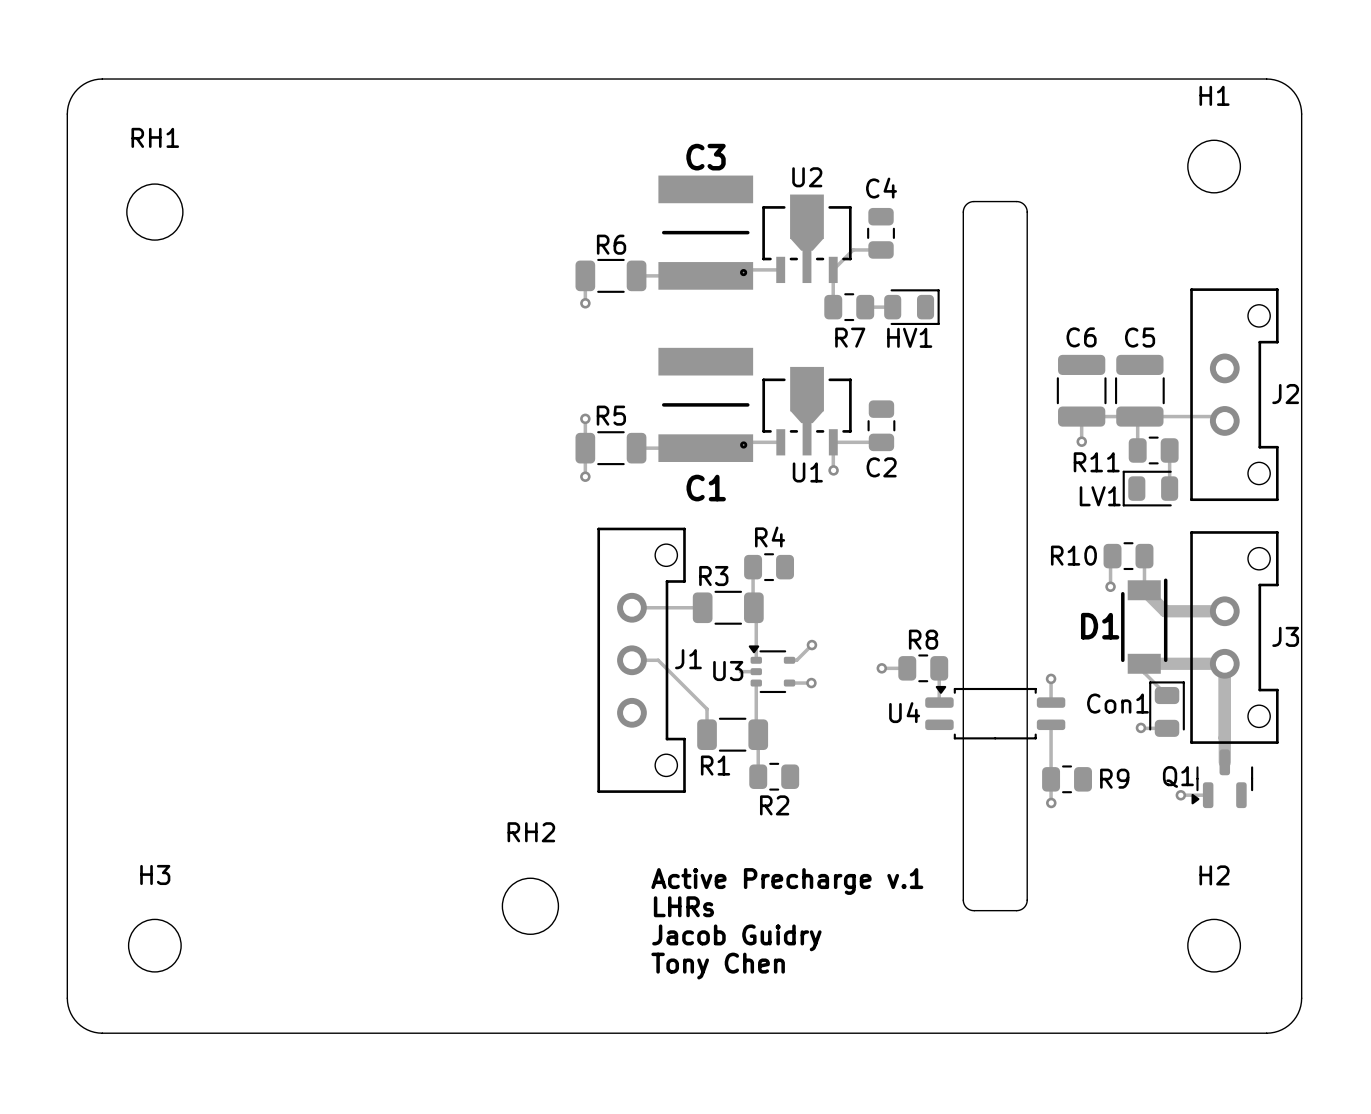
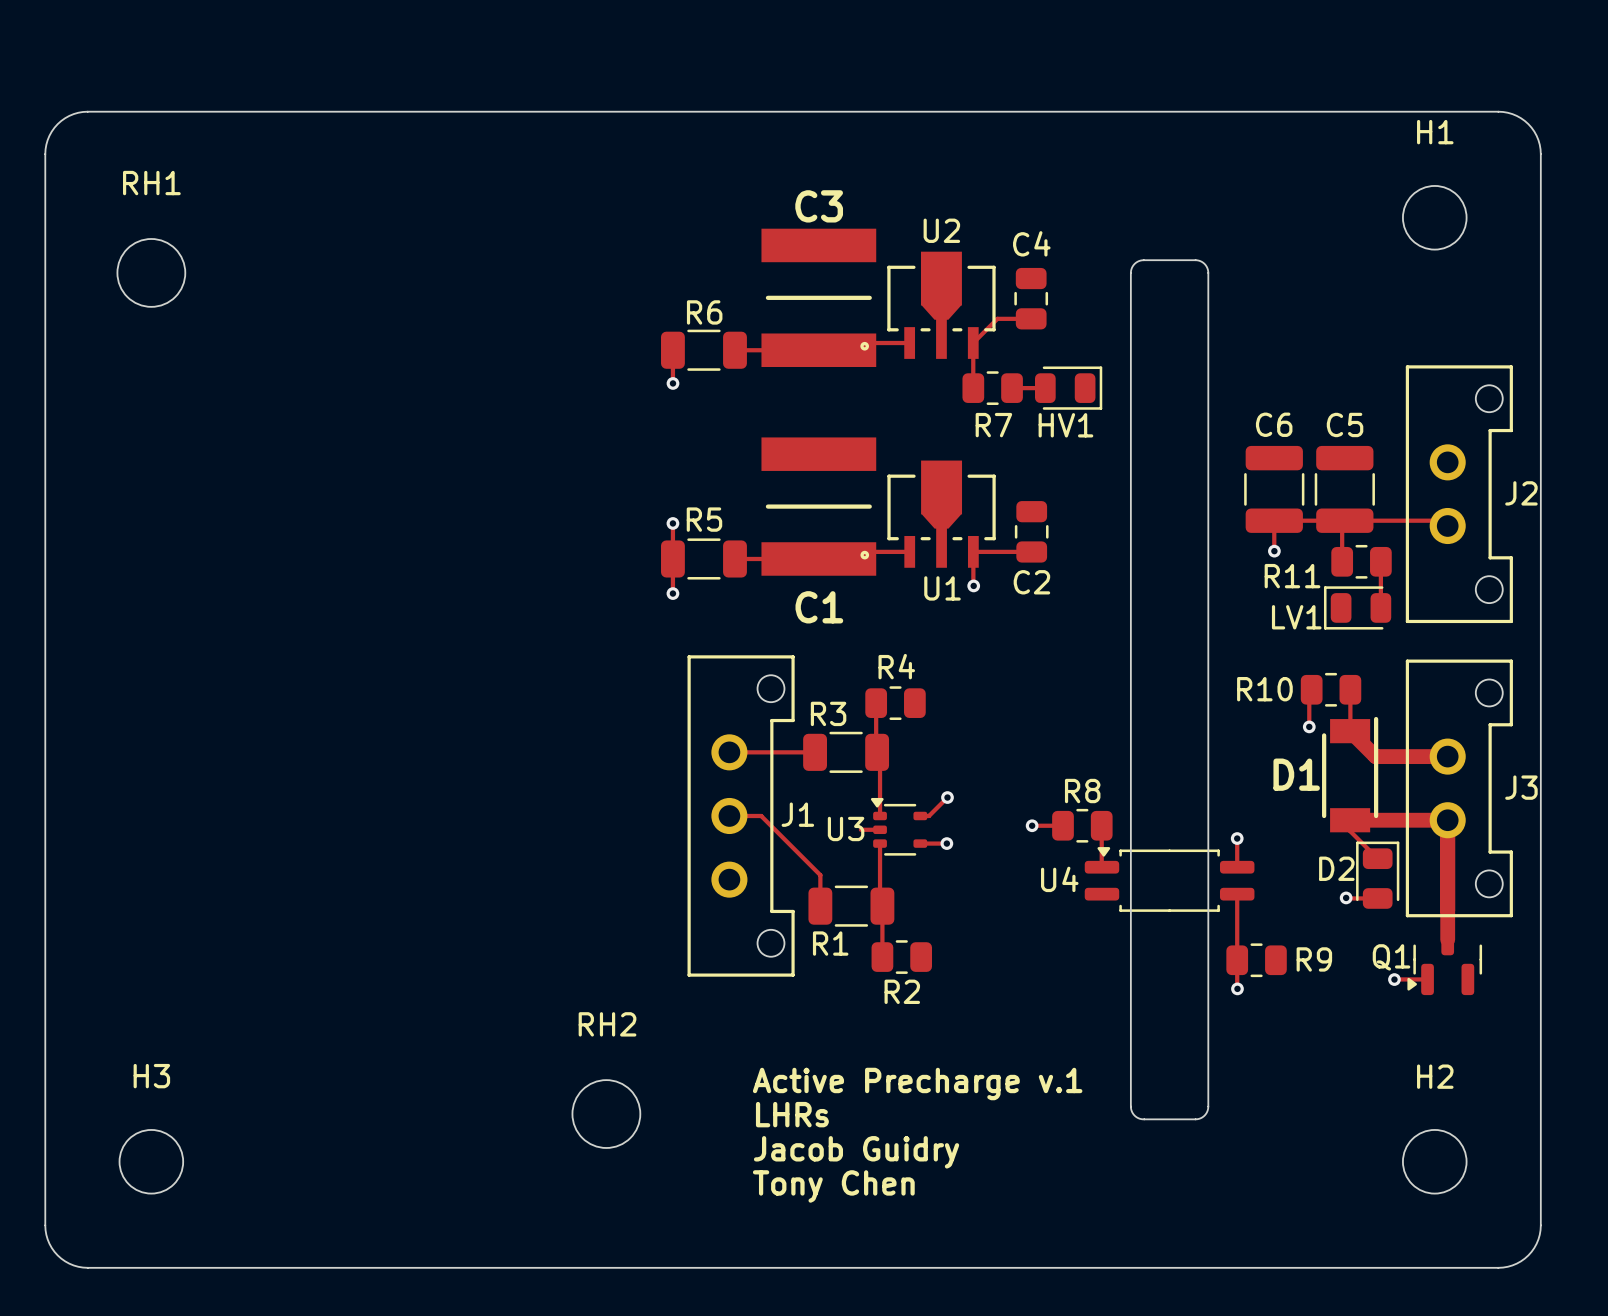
Con1 name: Con1 (1117, 703) -> D2 (1336, 868)

